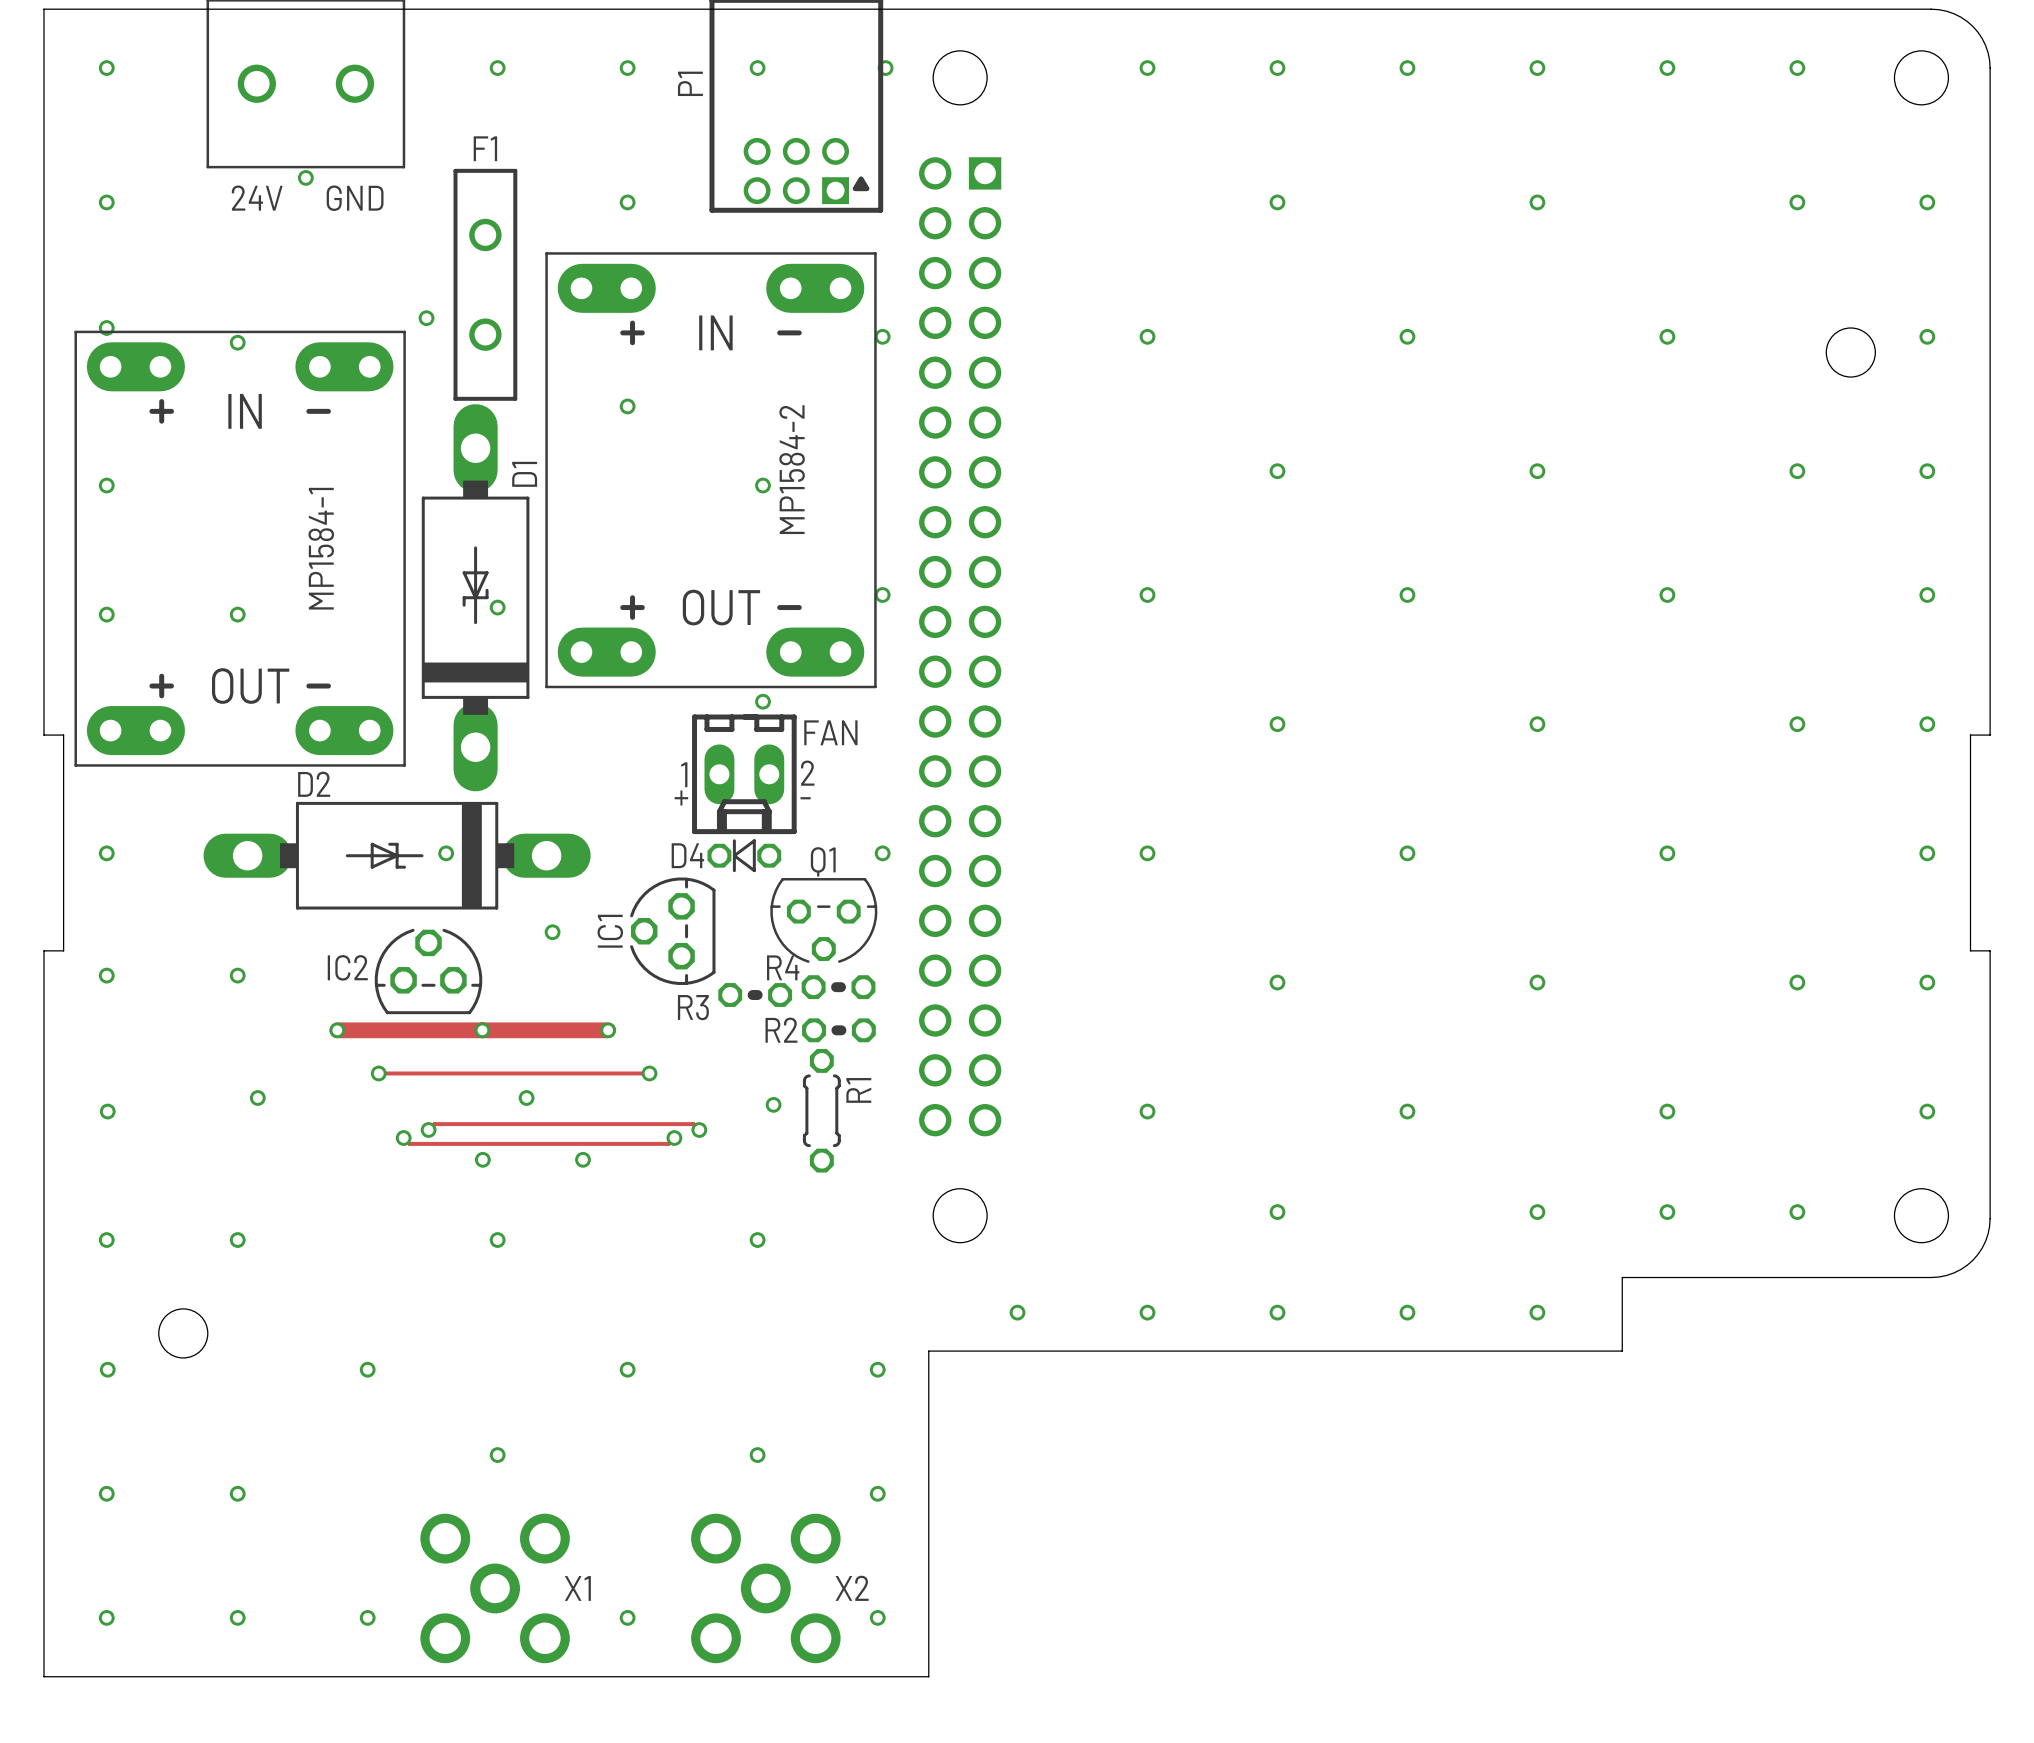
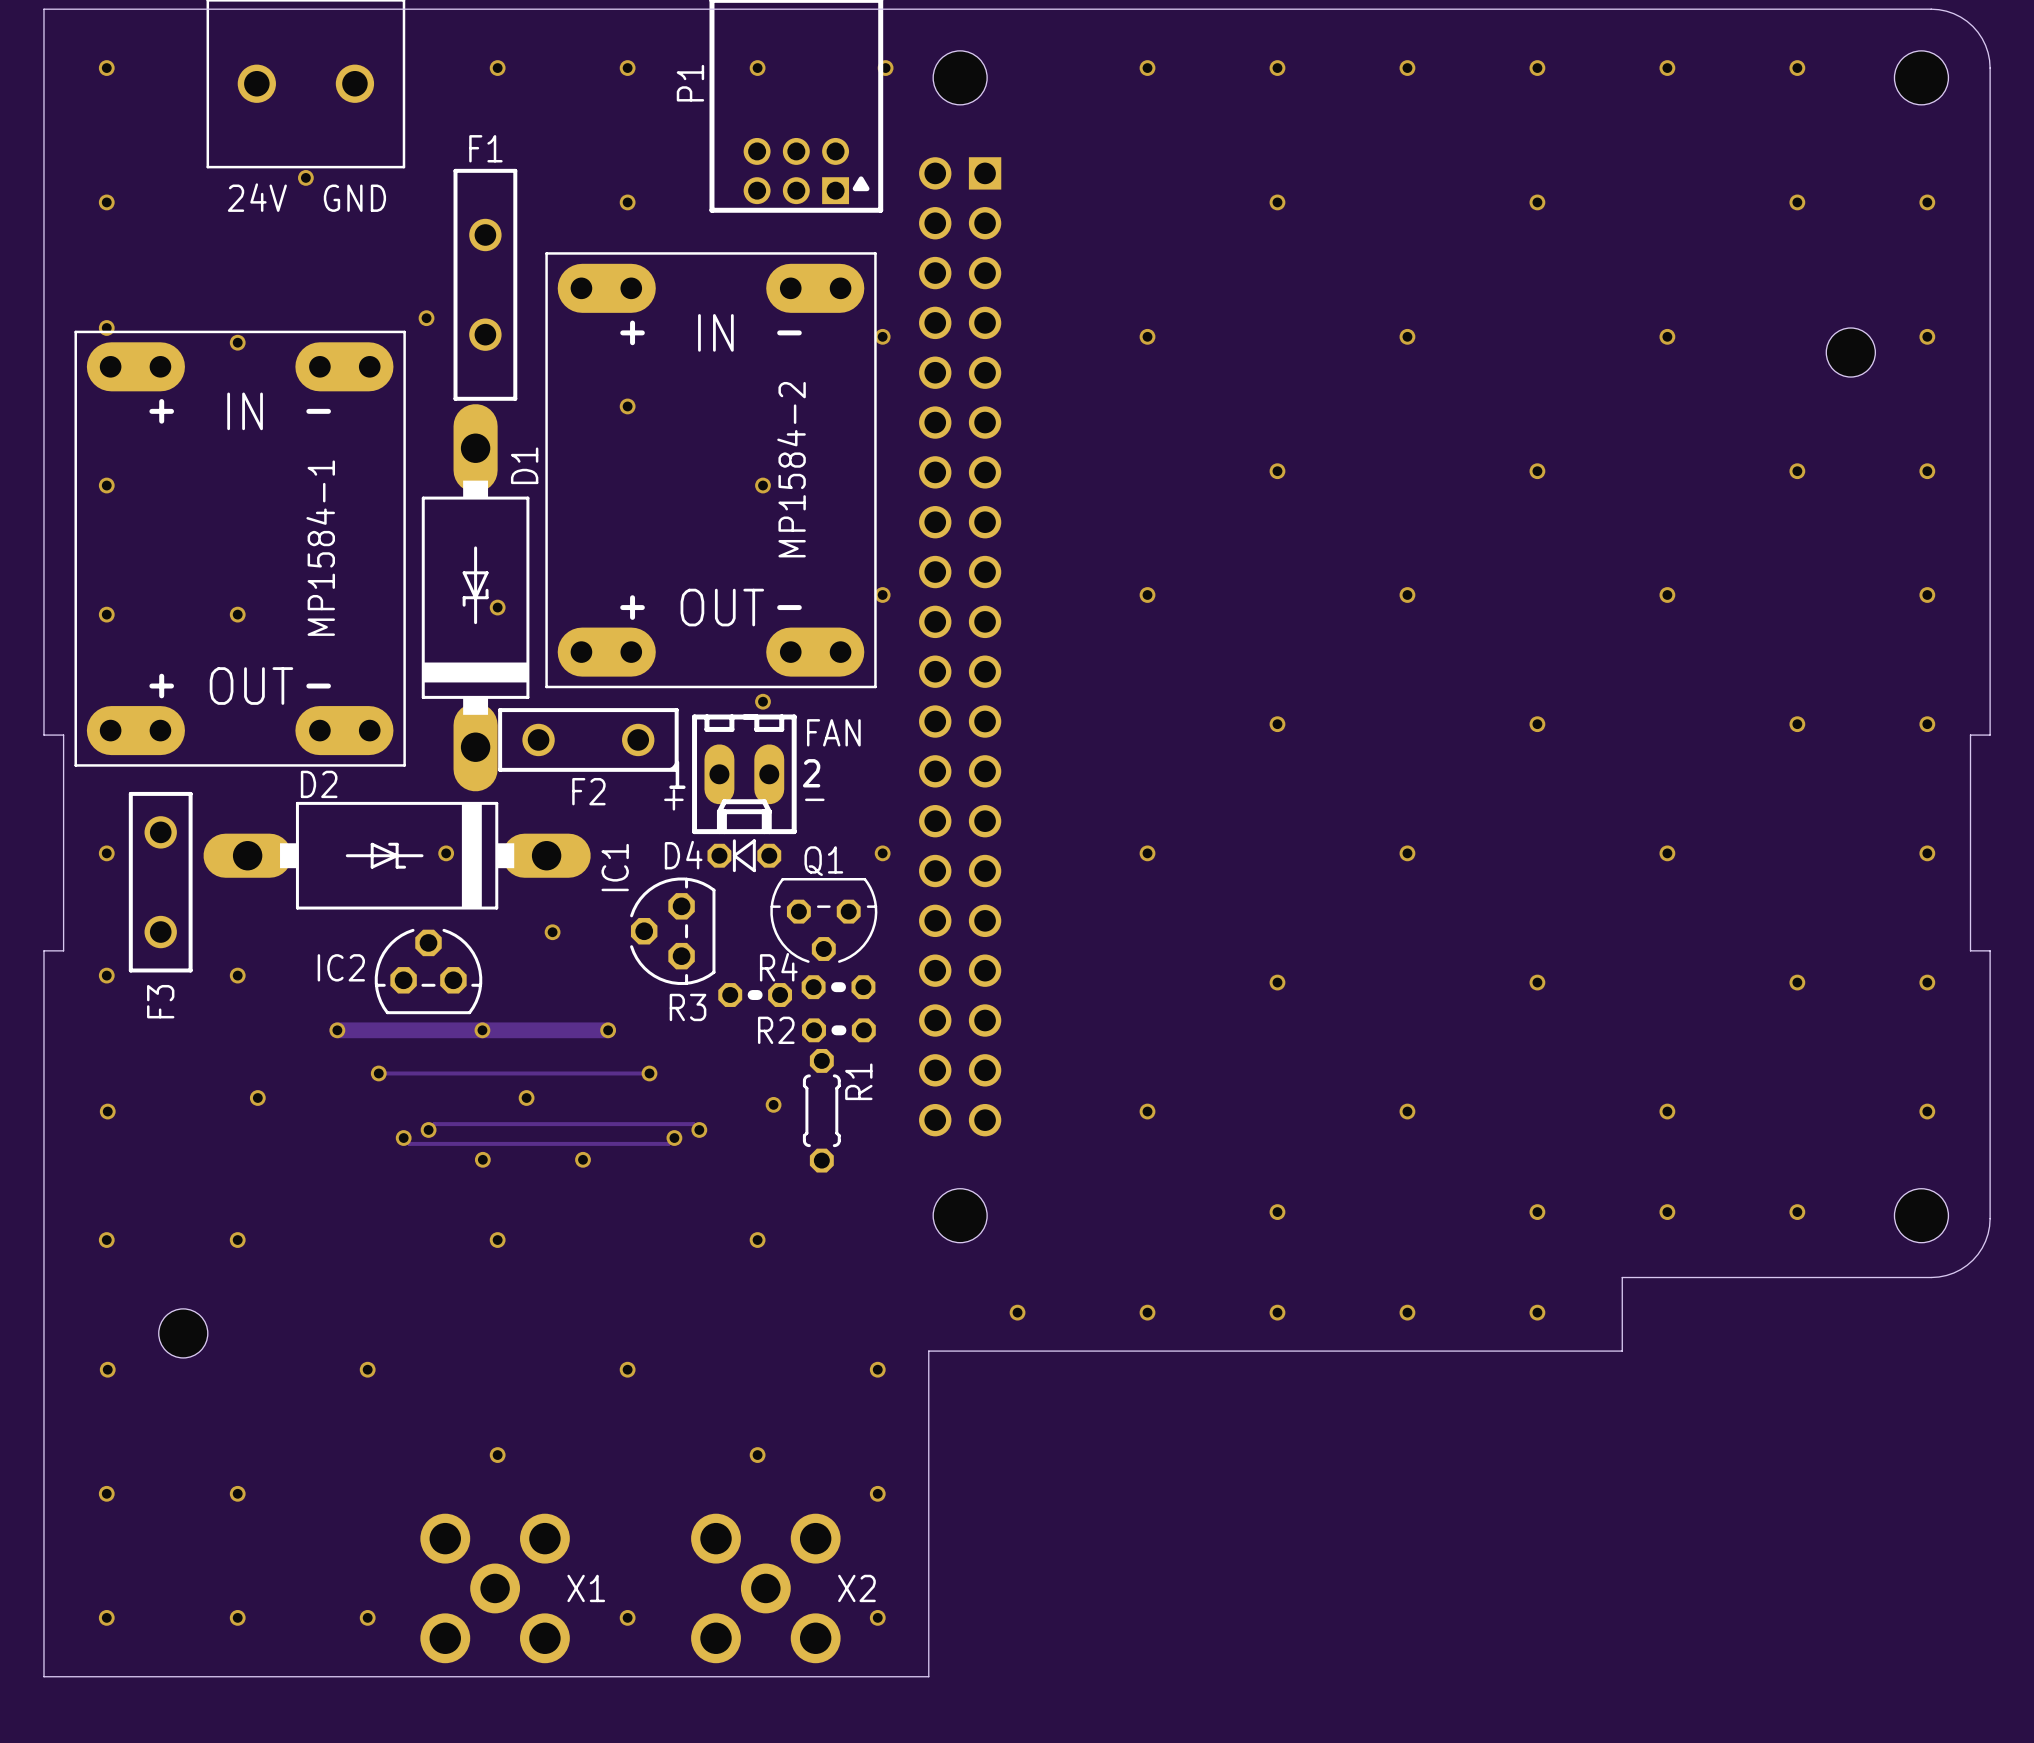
F2: none -> (588, 739)
F3: none -> (160, 882)
IC1 name position: IC1 (610, 931) -> IC1 (615, 867)

